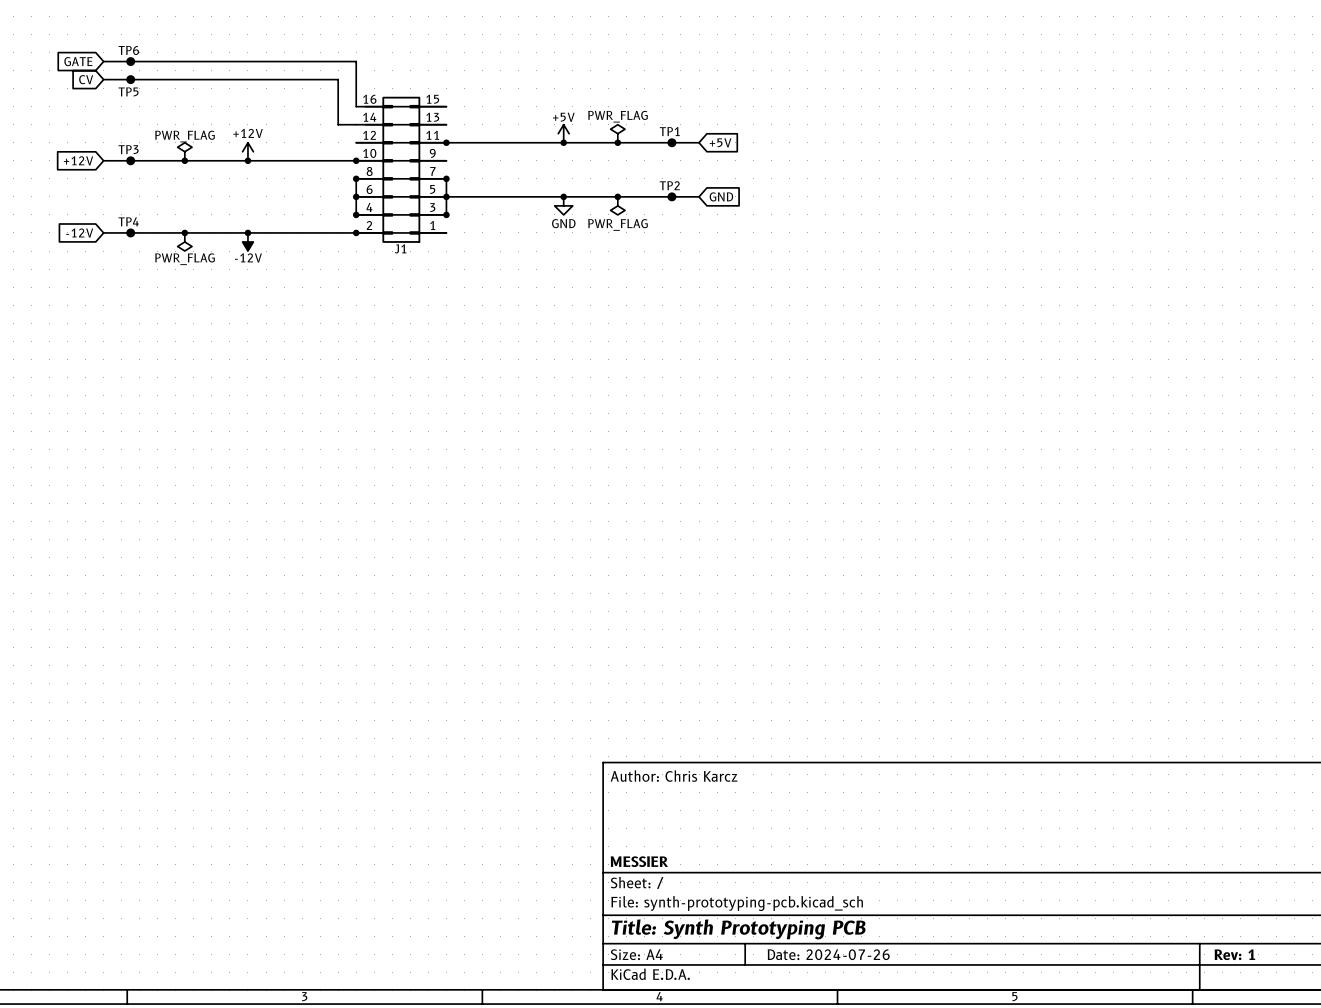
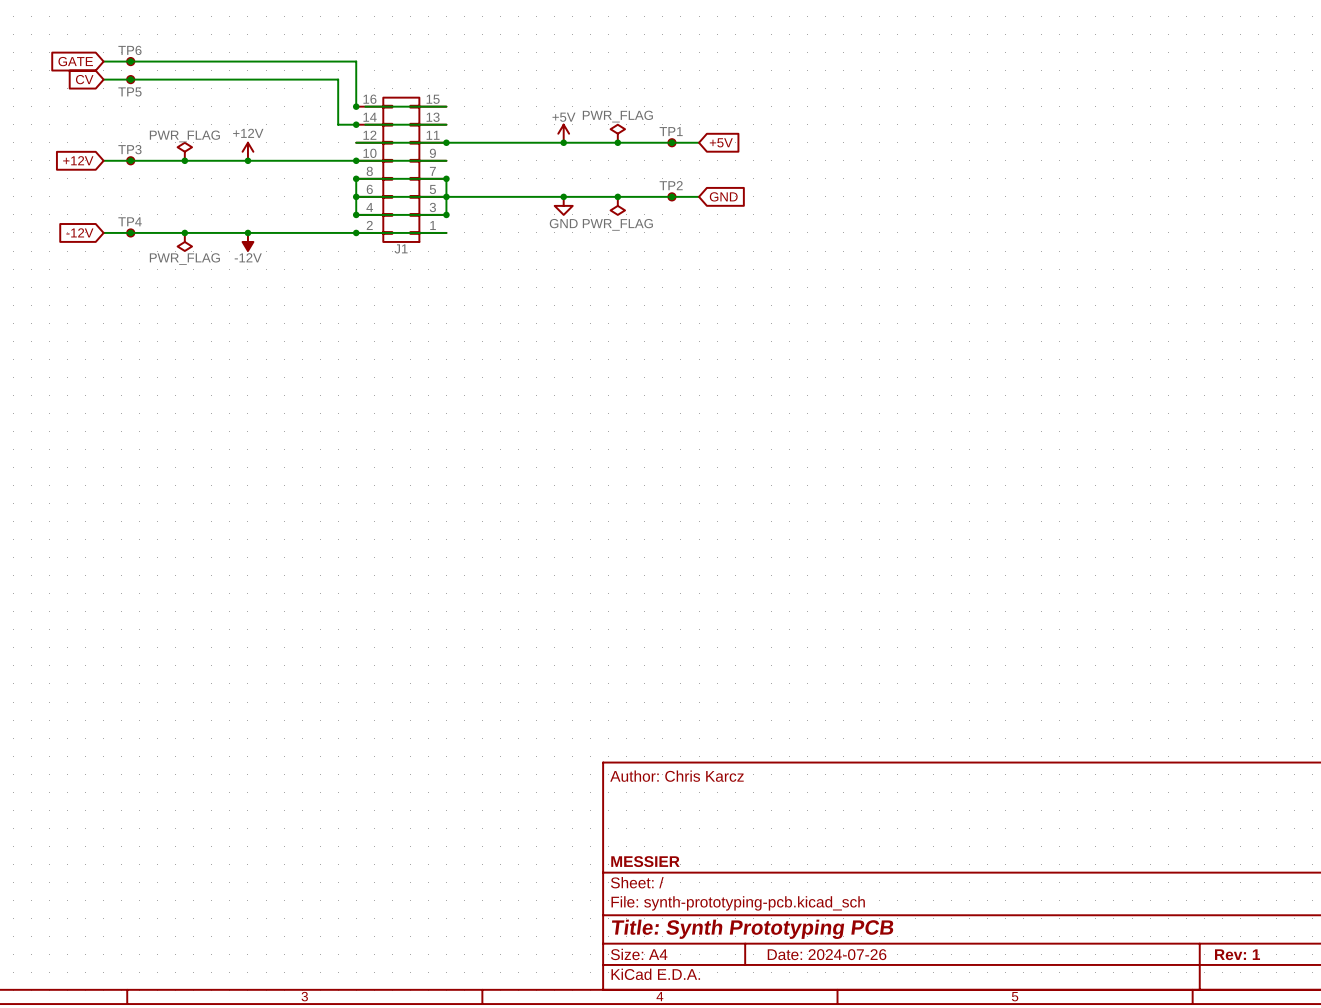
junction: none -> (356, 106)
junction: none -> (356, 124)

